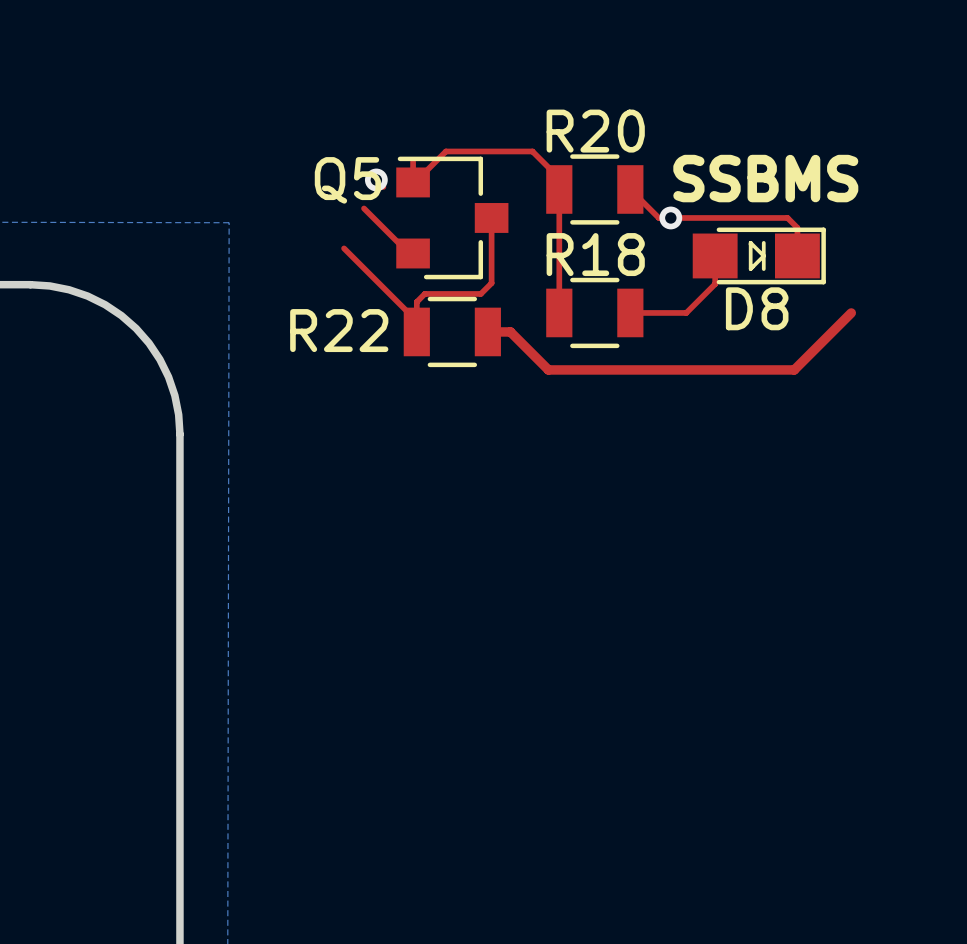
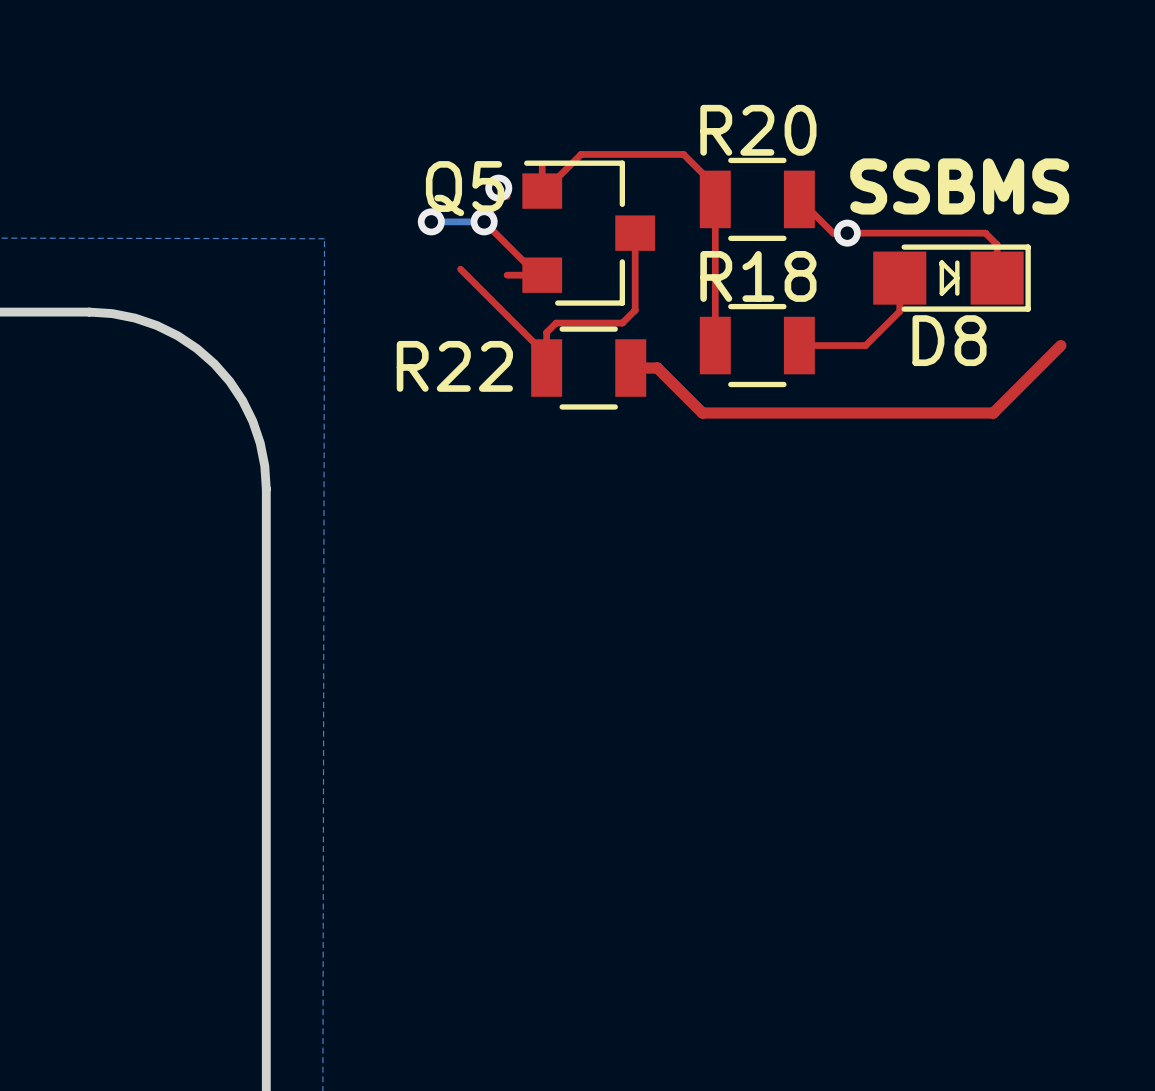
bottom track: none -> (431, 221) (484, 221)
via: none -> (431, 221)
via: none -> (484, 221)
top track: none -> (507, 275) (542, 275)

